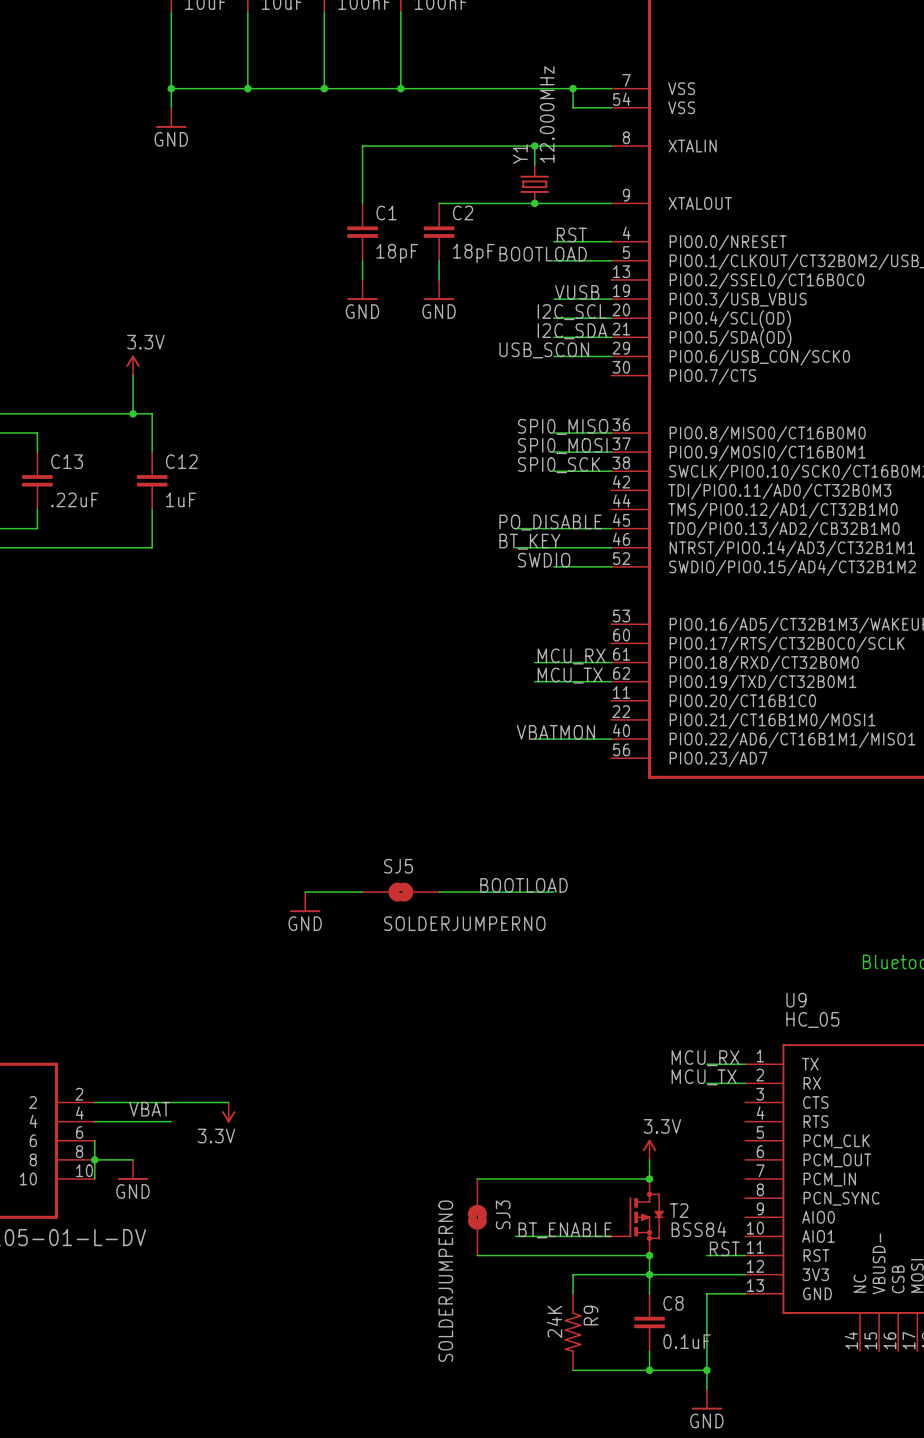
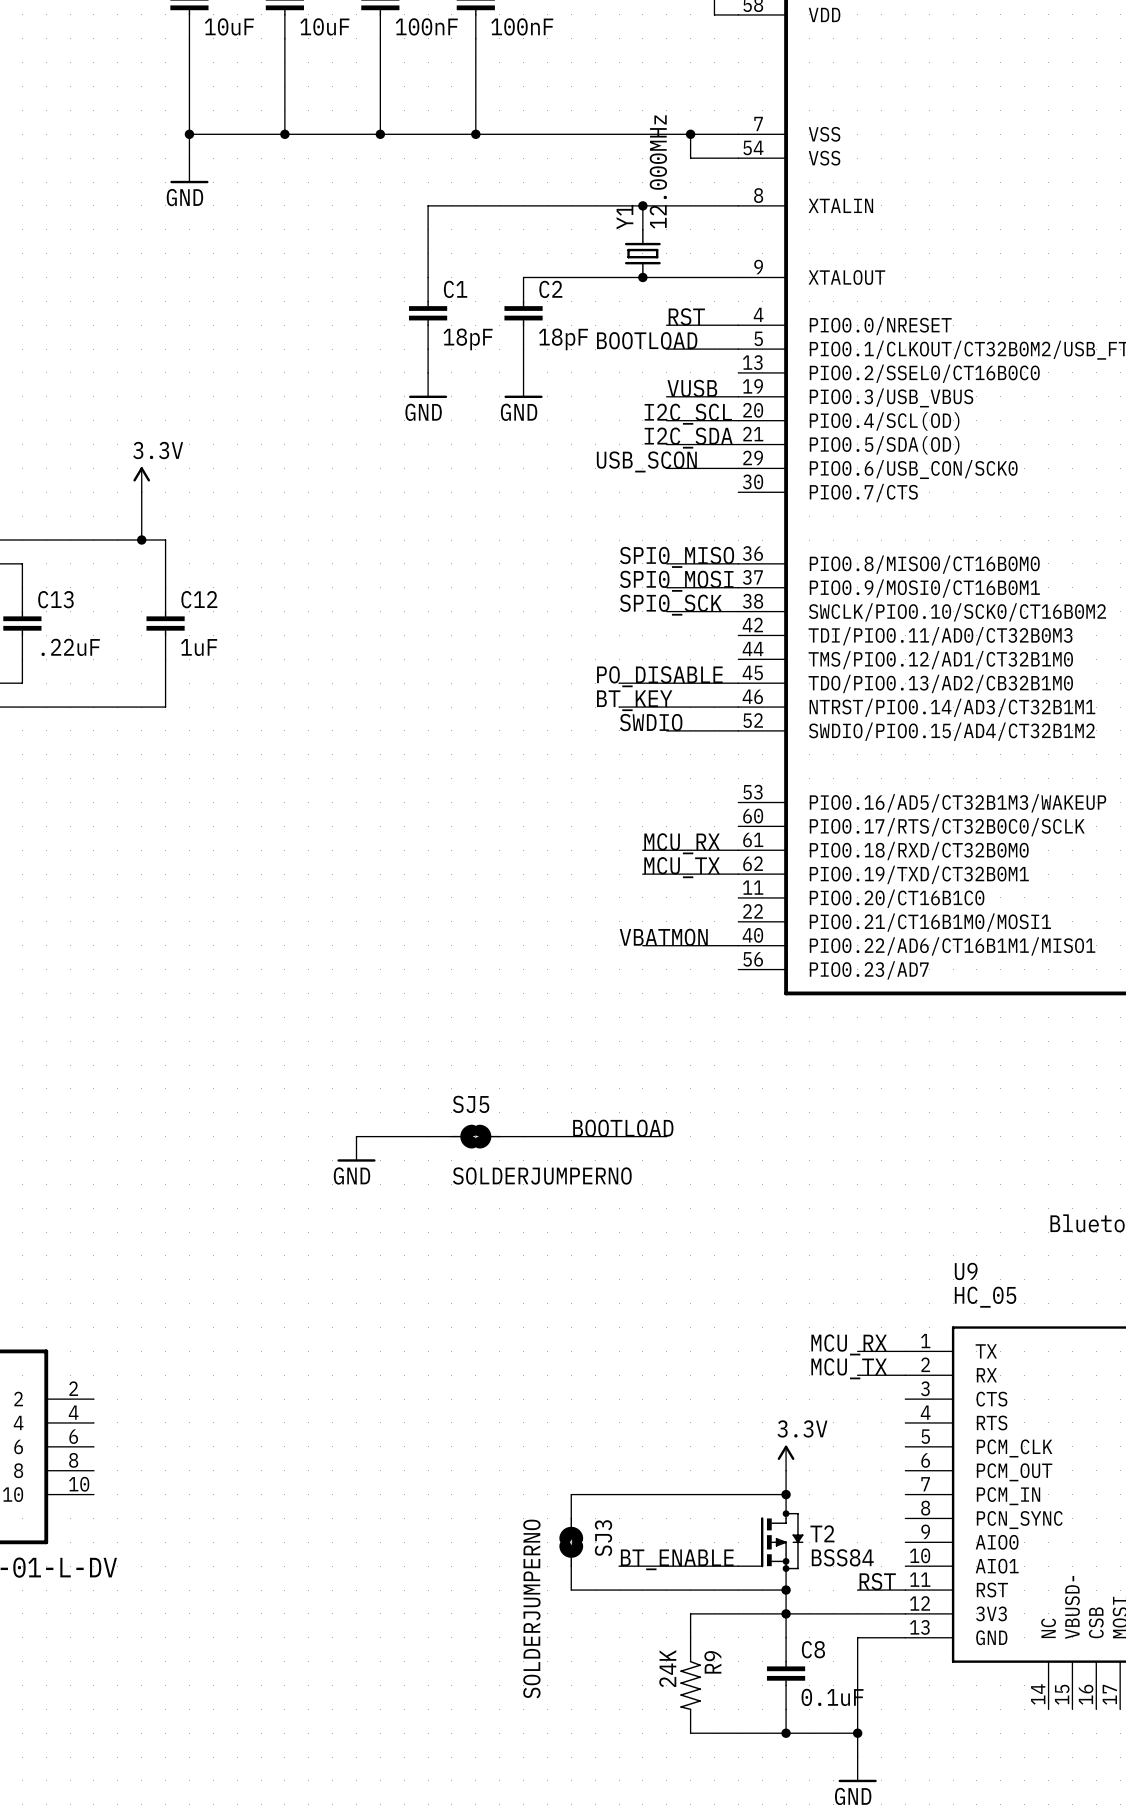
wire: (94, 1102) (228, 1102) -> none
label: VBAT (149, 1109) -> none
power symbol: 3.3V (228, 1112) -> none
wire: (94, 1121) (171, 1121) -> none
wire: (94, 1140) (94, 1179) -> none
wire: (94, 1159) (133, 1159) -> none
junction: (94, 1159) -> none
power symbol: GND (133, 1169) -> none

